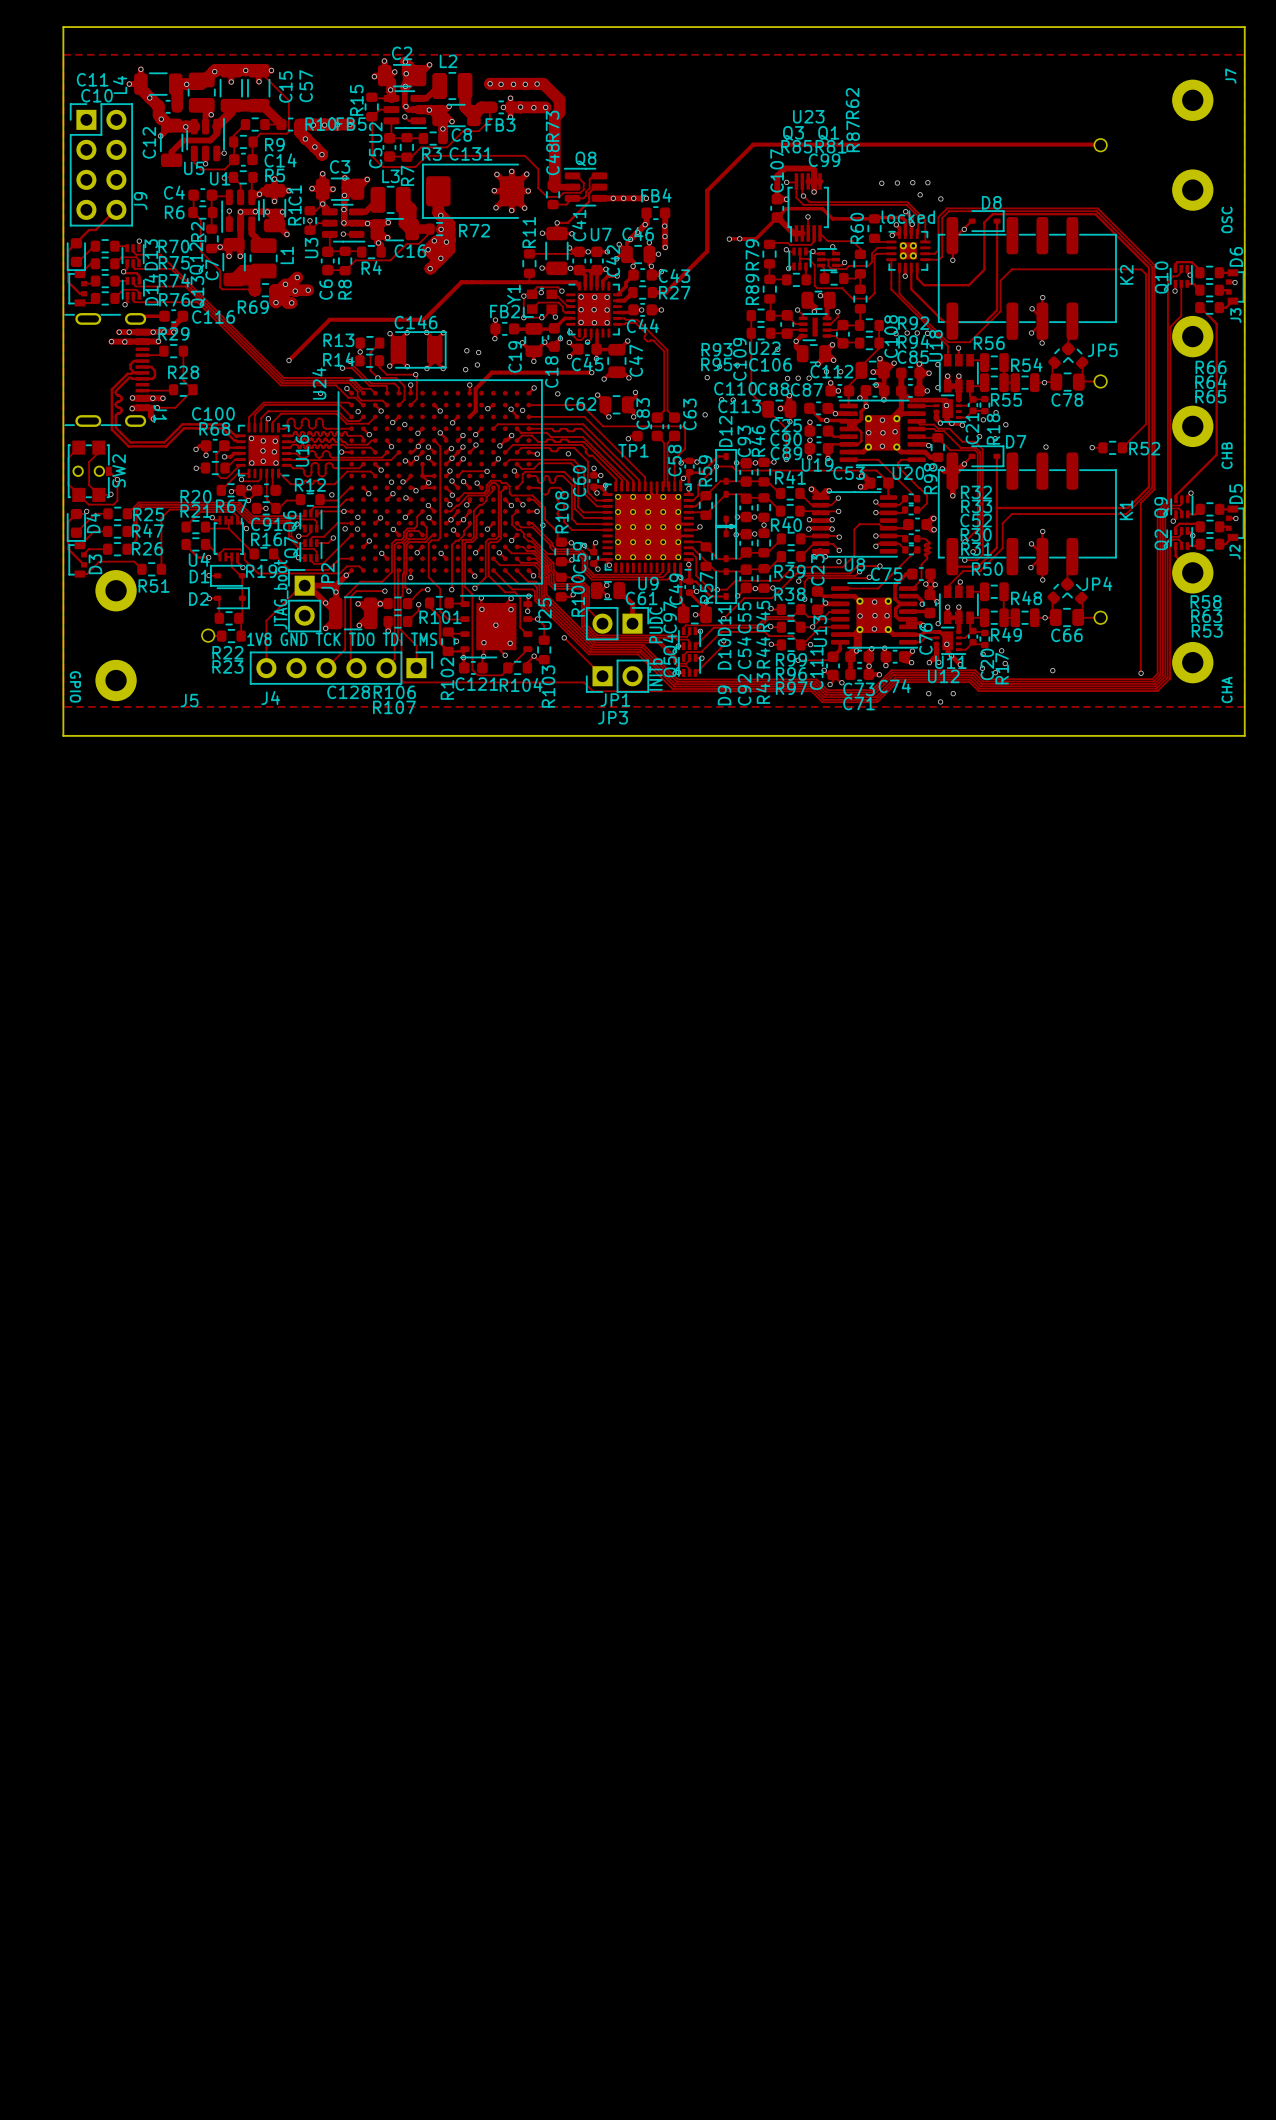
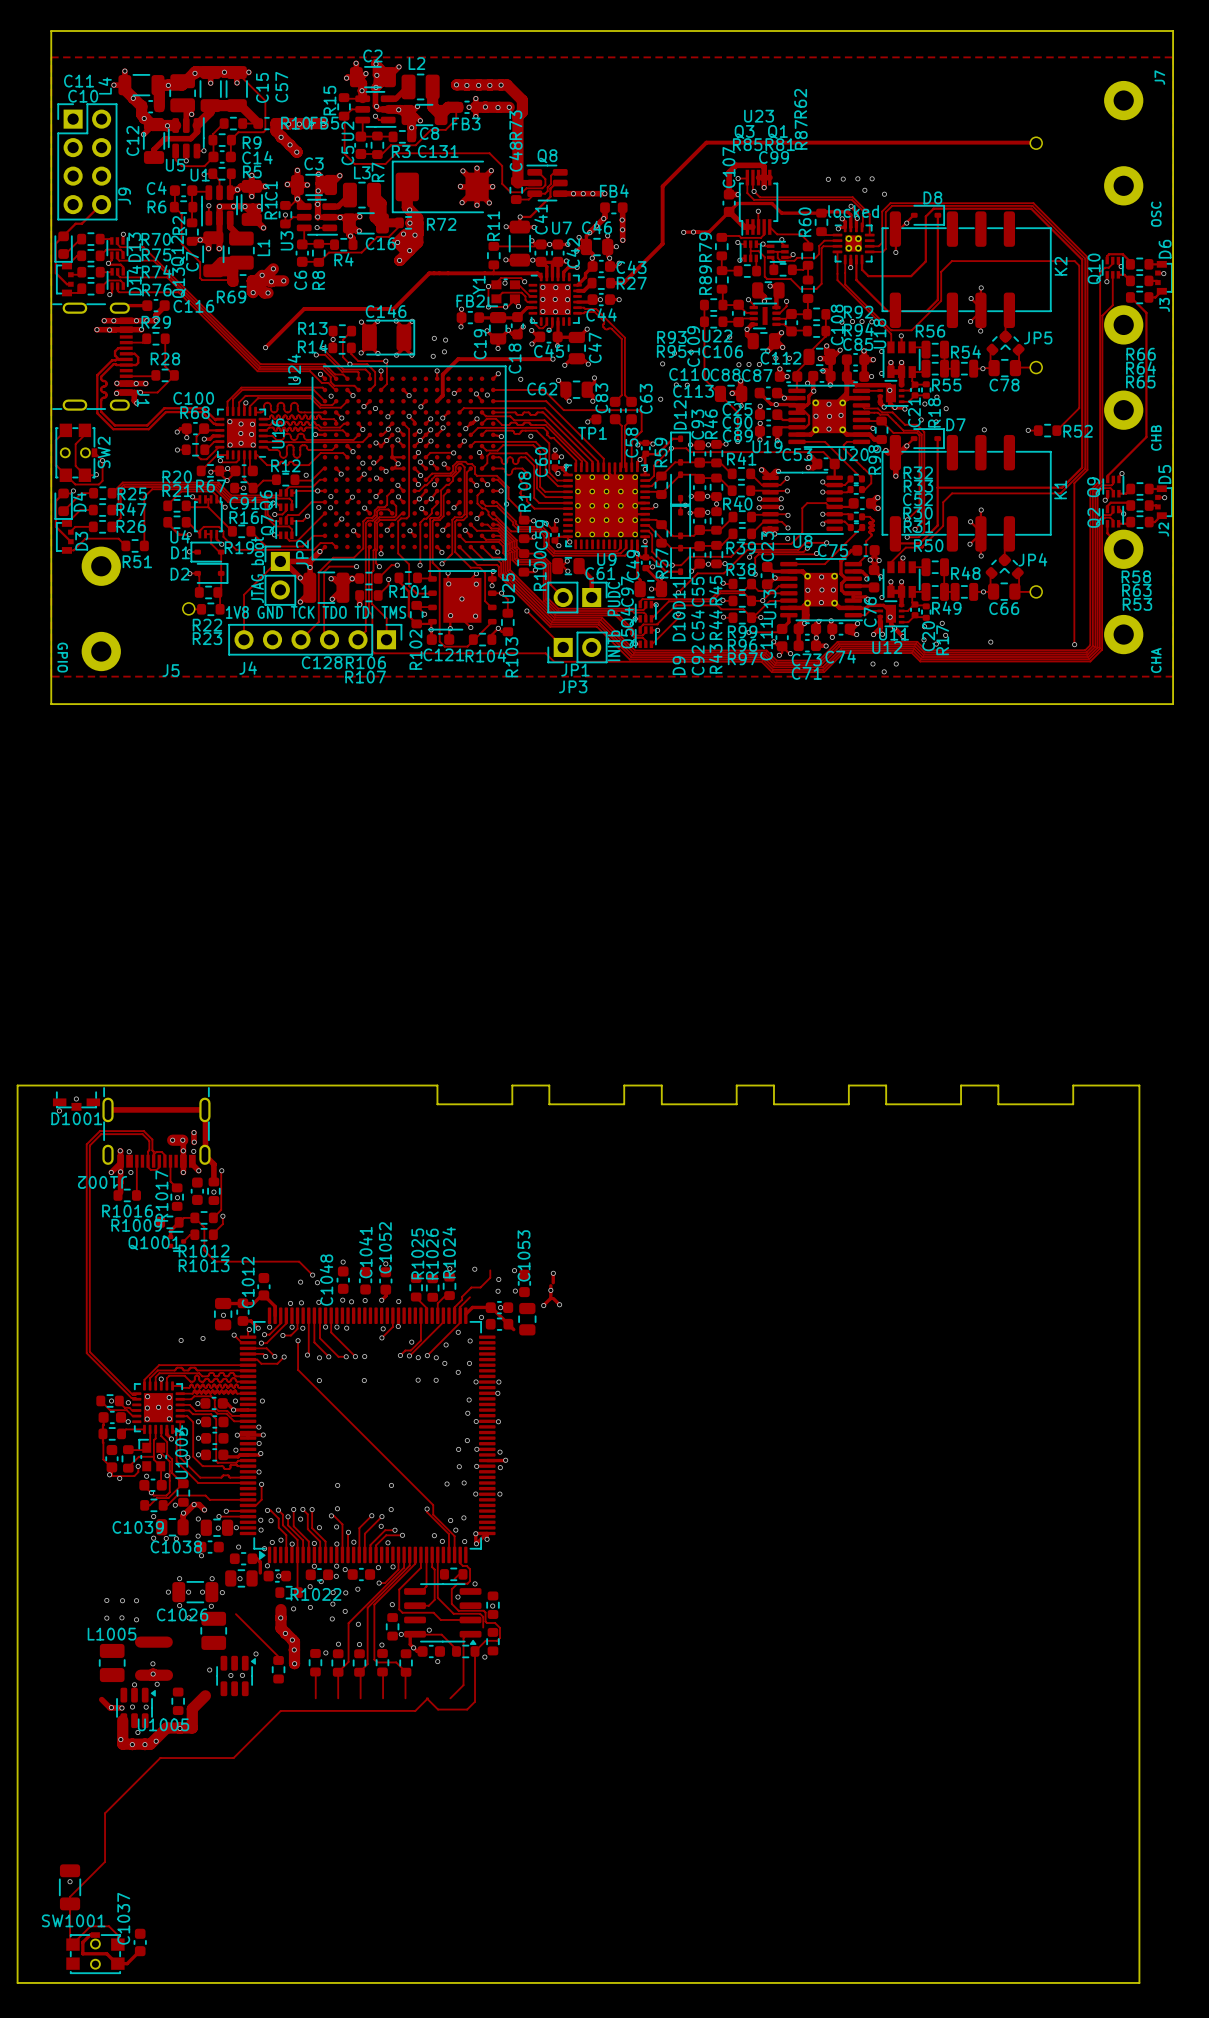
board edge: none -> (17, 1085) (437, 1085) (437, 1104) (512, 1104) (512, 1085) (549, 1085) (549, 1104) (624, 1104) (624, 1085) (661, 1085) (661, 1104) (736, 1104) (736, 1085) (773, 1085) (773, 1104) (848, 1104) (848, 1085) (886, 1085) (886, 1104) (961, 1104) (961, 1085) (998, 1085) (998, 1104) (1073, 1104) (1073, 1085) (1139, 1085) (1139, 1982) (17, 1982) (17, 1085)
via: none -> (76, 1098)
D1001: none -> (76, 1101)
track: none -> (205, 1108) (205, 1155) (213, 1164) (213, 1181)
track: none -> (108, 1109) (204, 1109)
via: none -> (59, 1110)
J1002: none -> (156, 1127)
track: none -> (194, 1132) (194, 1142)
via: none -> (194, 1132)
track: none -> (172, 1140) (183, 1140) (183, 1172)
via: none -> (172, 1140)
via: none -> (182, 1140)
via: none -> (194, 1142)
track: none -> (120, 1150) (120, 1192)
via: none -> (120, 1150)
via: none -> (183, 1150)
via: none -> (193, 1151)
via: none -> (129, 1151)
track: none -> (165, 1155) (161, 1151) (156, 1151) (153, 1154) (153, 1161) (152, 1139) (143, 1131) (99, 1131) (86, 1144) (86, 1353) (131, 1398) (136, 1399)
track: none -> (136, 1161) (136, 1193)
track: none -> (159, 1161) (159, 1167) (156, 1169) (150, 1169) (148, 1167) (149, 1140) (142, 1134) (101, 1134) (89, 1145) (89, 1351) (132, 1394) (136, 1393)
track: none -> (170, 1161) (170, 1181) (177, 1188)
track: none -> (120, 1163) (111, 1172)
track: none -> (192, 1164) (198, 1170)
via: none -> (198, 1170)
track: none -> (221, 1170) (221, 1210) (213, 1217)
via: none -> (221, 1170)
via: none -> (120, 1171)
via: none -> (111, 1172)
via: none -> (130, 1172)
via: none -> (183, 1172)
part: none -> (197, 1191)
part: none -> (213, 1191)
via: none -> (213, 1192)
R1016: none -> (127, 1195)
R1017: none -> (177, 1197)
via: none -> (177, 1197)
track: none -> (222, 1216) (222, 1224) (212, 1234)
via: none -> (222, 1216)
R1012: none -> (204, 1217)
R1009: none -> (169, 1222)
track: none -> (179, 1222) (170, 1230) (170, 1236)
track: none -> (178, 1223) (184, 1217) (194, 1217) (204, 1227) (204, 1250) (215, 1261) (299, 1261) (312, 1275)
R1013: none -> (204, 1234)
track: none -> (194, 1235) (189, 1235) (183, 1241)
Q1001: none -> (174, 1241)
via: none -> (343, 1262)
via: none -> (385, 1263)
via: none -> (449, 1268)
via: none -> (474, 1269)
track: none -> (490, 1270) (490, 1277) (480, 1287) (471, 1287) (462, 1296) (462, 1299) (454, 1307) (454, 1315)
via: none -> (514, 1270)
track: none -> (553, 1273) (553, 1282)
via: none -> (553, 1273)
via: none -> (312, 1275)
via: none -> (498, 1279)
C1048: none -> (343, 1280)
C1041: none -> (365, 1280)
C1052: none -> (385, 1280)
via: none -> (300, 1282)
via: none -> (317, 1282)
C1053: none -> (524, 1283)
track: none -> (550, 1285) (550, 1298)
C1012: none -> (263, 1286)
R1024: none -> (449, 1286)
R1026: none -> (416, 1287)
R1025: none -> (432, 1288)
track: none -> (386, 1289) (386, 1295) (381, 1300)
via: none -> (550, 1290)
via: none -> (498, 1291)
via: none -> (515, 1291)
track: none -> (263, 1293) (253, 1303) (223, 1303)
track: none -> (263, 1295) (275, 1306) (275, 1315)
track: none -> (445, 1295) (437, 1303) (437, 1315)
track: none -> (415, 1297) (426, 1307) (426, 1315)
track: none -> (470, 1297) (460, 1307) (460, 1315)
track: none -> (550, 1298) (543, 1305)
track: none -> (553, 1298) (559, 1304)
via: none -> (342, 1300)
via: none -> (381, 1300)
via: none -> (365, 1300)
via: none -> (318, 1302)
via: none -> (351, 1301)
via: none -> (398, 1301)
via: none -> (301, 1302)
via: none -> (290, 1303)
via: none -> (559, 1304)
via: none -> (543, 1305)
track: none -> (491, 1307) (472, 1307) (465, 1314)
part: none -> (499, 1307)
via: none -> (500, 1307)
track: none -> (492, 1308) (513, 1329)
part: none -> (242, 1312)
part: none -> (223, 1314)
via: none -> (223, 1315)
track: none -> (280, 1315) (280, 1323) (269, 1334) (264, 1334)
track: none -> (286, 1315) (286, 1323) (266, 1343) (261, 1343)
track: none -> (297, 1315) (297, 1328) (290, 1335) (282, 1335)
track: none -> (308, 1315) (307, 1355)
track: none -> (314, 1315) (314, 1342) (328, 1356)
track: none -> (319, 1315) (319, 1338) (338, 1356) (346, 1356)
track: none -> (331, 1315) (331, 1332) (355, 1356)
track: none -> (392, 1315) (392, 1326) (381, 1337)
track: none -> (420, 1315) (420, 1340) (410, 1350) (405, 1350) (400, 1355)
via: none -> (481, 1317)
part: none -> (527, 1319)
track: none -> (242, 1320) (251, 1320) (258, 1328)
track: none -> (443, 1322) (409, 1355)
track: none -> (459, 1323) (427, 1355)
part: none -> (499, 1324)
via: none -> (325, 1327)
via: none -> (398, 1326)
via: none -> (269, 1327)
via: none -> (292, 1327)
via: none -> (336, 1327)
via: none -> (258, 1328)
via: none -> (302, 1328)
via: none -> (346, 1328)
via: none -> (383, 1328)
track: none -> (249, 1329) (248, 1337)
via: none -> (249, 1329)
via: none -> (458, 1332)
via: none -> (264, 1334)
track: none -> (234, 1335) (241, 1342)
via: none -> (234, 1335)
via: none -> (282, 1335)
via: none -> (203, 1338)
via: none -> (381, 1337)
via: none -> (181, 1340)
track: none -> (298, 1340) (298, 1369) (433, 1505) (433, 1514) (454, 1536) (454, 1554)
via: none -> (298, 1340)
via: none -> (470, 1340)
via: none -> (411, 1342)
via: none -> (261, 1343)
via: none -> (446, 1344)
track: none -> (248, 1348) (266, 1348) (274, 1356)
track: none -> (247, 1353) (263, 1353) (265, 1356)
via: none -> (307, 1355)
via: none -> (400, 1355)
via: none -> (265, 1356)
via: none -> (274, 1356)
via: none -> (364, 1356)
via: none -> (409, 1355)
via: none -> (427, 1355)
track: none -> (284, 1356) (277, 1363) (261, 1363) (257, 1359) (248, 1359)
via: none -> (284, 1356)
via: none -> (328, 1356)
via: none -> (346, 1356)
via: none -> (355, 1356)
via: none -> (319, 1357)
via: none -> (418, 1357)
via: none -> (436, 1357)
via: none -> (444, 1363)
via: none -> (469, 1363)
track: none -> (247, 1365) (159, 1365) (144, 1379) (144, 1385)
track: none -> (248, 1370) (197, 1370) (194, 1367) (190, 1367) (188, 1370) (177, 1367) (174, 1370) (157, 1370) (150, 1378) (150, 1385)
via: none -> (458, 1372)
track: none -> (247, 1376) (235, 1376) (232, 1373) (227, 1376) (222, 1373) (217, 1376) (212, 1373) (207, 1376) (202, 1376) (199, 1373) (159, 1373) (155, 1377) (155, 1385)
via: none -> (161, 1379)
via: none -> (418, 1380)
via: none -> (436, 1380)
via: none -> (319, 1380)
via: none -> (364, 1380)
track: none -> (248, 1381) (236, 1381) (234, 1378) (229, 1381) (225, 1378) (221, 1381) (216, 1378) (212, 1381) (207, 1378) (201, 1381) (197, 1375) (194, 1381) (190, 1381) (184, 1375) (169, 1375) (166, 1378) (166, 1385)
via: none -> (476, 1381)
via: none -> (498, 1382)
track: none -> (172, 1385) (189, 1387) (191, 1384) (194, 1387) (197, 1384) (200, 1387) (202, 1384) (205, 1387) (208, 1384) (211, 1387) (214, 1384) (216, 1387) (219, 1384) (222, 1387) (225, 1384) (228, 1387) (230, 1384) (233, 1387) (236, 1384) (239, 1387) (248, 1387)
via: none -> (497, 1393)
track: none -> (180, 1393) (192, 1393) (194, 1390) (196, 1393) (199, 1390) (201, 1393) (203, 1390) (205, 1393) (208, 1390) (209, 1393) (212, 1390) (215, 1393) (217, 1390) (219, 1393) (221, 1390) (223, 1393) (226, 1390) (228, 1393) (230, 1390) (233, 1393) (235, 1390) (237, 1393) (247, 1393)
via: none -> (147, 1396)
via: none -> (169, 1397)
track: none -> (180, 1399) (191, 1399) (194, 1396) (211, 1396) (214, 1399) (214, 1407) (218, 1410) (227, 1410) (232, 1415) (248, 1415)
via: none -> (469, 1399)
track: none -> (100, 1400) (110, 1410) (126, 1410) (132, 1416) (136, 1416)
part: none -> (110, 1400)
via: none -> (111, 1401)
via: none -> (235, 1401)
via: none -> (262, 1401)
track: none -> (118, 1401) (124, 1407) (136, 1410)
via: none -> (128, 1402)
via: none -> (197, 1403)
part: none -> (214, 1403)
track: none -> (222, 1403) (227, 1403) (233, 1409) (247, 1409)
track: none -> (180, 1404) (189, 1404) (195, 1410) (214, 1410) (217, 1413) (226, 1413) (234, 1421) (248, 1421)
via: none -> (158, 1407)
via: none -> (169, 1407)
via: none -> (147, 1408)
U1003: none -> (158, 1408)
track: none -> (180, 1410) (189, 1410) (192, 1414) (211, 1414) (216, 1419) (216, 1461) (217, 1462) (248, 1460)
via: none -> (233, 1409)
via: none -> (467, 1413)
track: none -> (180, 1416) (187, 1416) (193, 1422) (193, 1456) (202, 1466) (222, 1466) (225, 1469) (229, 1468) (230, 1465) (248, 1466)
track: none -> (103, 1417) (103, 1459) (111, 1467)
part: none -> (112, 1417)
via: none -> (147, 1419)
via: none -> (169, 1418)
via: none -> (128, 1421)
track: none -> (180, 1421) (180, 1457) (200, 1477) (221, 1477) (223, 1475) (228, 1475) (230, 1477) (247, 1477)
via: none -> (198, 1421)
part: none -> (214, 1421)
via: none -> (476, 1421)
via: none -> (498, 1421)
via: none -> (258, 1427)
track: none -> (161, 1428) (161, 1436) (167, 1442) (167, 1454) (172, 1459) (172, 1473) (182, 1483)
track: none -> (144, 1429) (125, 1429) (121, 1433)
track: none -> (150, 1429) (150, 1444)
track: none -> (155, 1429) (153, 1459) (161, 1466) (161, 1485)
track: none -> (166, 1429) (166, 1434) (171, 1439)
track: none -> (172, 1429) (176, 1433) (176, 1461) (198, 1483) (248, 1483)
part: none -> (112, 1433)
via: none -> (237, 1435)
track: none -> (263, 1435) (237, 1435)
via: none -> (263, 1435)
part: none -> (367, 1435)
via: none -> (171, 1439)
via: none -> (198, 1438)
part: none -> (214, 1438)
via: none -> (467, 1440)
via: none -> (259, 1443)
via: none -> (458, 1449)
via: none -> (476, 1449)
track: none -> (128, 1450) (144, 1450)
via: none -> (235, 1450)
via: none -> (500, 1452)
track: none -> (160, 1452) (169, 1461) (169, 1492) (166, 1495) (153, 1495) (144, 1486)
track: none -> (260, 1453) (239, 1454) (238, 1456) (226, 1456) (224, 1454)
via: none -> (260, 1453)
part: none -> (152, 1455)
via: none -> (198, 1454)
part: none -> (214, 1454)
track: none -> (153, 1456) (138, 1456) (128, 1467)
via: none -> (159, 1456)
via: none -> (187, 1457)
part: none -> (111, 1458)
part: none -> (128, 1458)
track: none -> (505, 1460) (487, 1460)
via: none -> (505, 1460)
track: none -> (138, 1466) (138, 1472) (134, 1476) (112, 1476) (111, 1467)
via: none -> (138, 1466)
via: none -> (476, 1466)
via: none -> (459, 1466)
via: none -> (500, 1467)
via: none -> (259, 1472)
via: none -> (109, 1474)
via: none -> (167, 1475)
via: none -> (146, 1476)
via: none -> (119, 1478)
track: none -> (183, 1483) (168, 1498) (157, 1498) (149, 1505) (144, 1505)
via: none -> (464, 1482)
track: none -> (261, 1484) (261, 1499) (256, 1505) (247, 1505)
via: none -> (261, 1484)
via: none -> (447, 1484)
part: none -> (153, 1485)
via: none -> (337, 1485)
via: none -> (391, 1485)
via: none -> (151, 1492)
part: none -> (183, 1493)
via: none -> (475, 1494)
via: none -> (499, 1494)
track: none -> (248, 1499) (209, 1499) (205, 1495) (177, 1495) (167, 1505) (163, 1505)
via: none -> (194, 1504)
part: none -> (153, 1505)
via: none -> (175, 1505)
track: none -> (302, 1509) (307, 1514) (307, 1529) (320, 1541) (320, 1555)
via: none -> (302, 1509)
via: none -> (337, 1508)
track: none -> (427, 1509) (427, 1512) (448, 1534) (448, 1554)
via: none -> (427, 1509)
track: none -> (204, 1509) (199, 1504) (194, 1504) (183, 1515) (183, 1527)
via: none -> (204, 1509)
track: none -> (278, 1510) (282, 1514) (282, 1525) (297, 1539) (297, 1592)
via: none -> (278, 1510)
track: none -> (293, 1509) (293, 1526) (308, 1541) (308, 1555)
via: none -> (293, 1509)
track: none -> (312, 1509) (312, 1528) (325, 1541) (325, 1555)
via: none -> (312, 1509)
via: none -> (391, 1509)
via: none -> (226, 1511)
track: none -> (248, 1511) (226, 1511)
track: none -> (267, 1510) (270, 1510) (278, 1518) (278, 1527) (286, 1535) (286, 1554)
via: none -> (267, 1510)
via: none -> (183, 1513)
track: none -> (331, 1515) (333, 1515) (342, 1524) (342, 1555)
via: none -> (331, 1515)
track: none -> (371, 1515) (359, 1528) (359, 1555)
via: none -> (371, 1515)
via: none -> (153, 1516)
track: none -> (218, 1516) (247, 1516)
via: none -> (218, 1516)
track: none -> (288, 1516) (288, 1525) (303, 1540) (303, 1554)
via: none -> (288, 1516)
track: none -> (381, 1516) (364, 1533) (364, 1554)
via: none -> (381, 1516)
via: none -> (463, 1517)
via: none -> (198, 1518)
via: none -> (300, 1519)
via: none -> (260, 1520)
via: none -> (271, 1520)
via: none -> (450, 1520)
via: none -> (381, 1526)
C1039: none -> (172, 1527)
via: none -> (336, 1526)
part: none -> (216, 1527)
via: none -> (218, 1528)
via: none -> (236, 1527)
via: none -> (319, 1527)
via: none -> (261, 1530)
track: none -> (395, 1530) (385, 1530) (370, 1545) (370, 1555)
via: none -> (395, 1530)
via: none -> (455, 1530)
track: none -> (348, 1532) (348, 1554)
via: none -> (348, 1532)
via: none -> (475, 1533)
track: none -> (486, 1533) (476, 1543) (475, 1543) (476, 1533) (487, 1533) (487, 1539)
track: none -> (402, 1535) (386, 1535) (376, 1545) (376, 1554)
via: none -> (402, 1535)
via: none -> (434, 1535)
via: none -> (198, 1536)
via: none -> (153, 1538)
via: none -> (166, 1538)
via: none -> (176, 1538)
via: none -> (487, 1539)
via: none -> (280, 1540)
via: none -> (442, 1541)
via: none -> (464, 1541)
via: none -> (272, 1542)
via: none -> (353, 1542)
via: none -> (314, 1543)
via: none -> (387, 1542)
via: none -> (292, 1544)
via: none -> (336, 1544)
via: none -> (476, 1543)
C1038: none -> (210, 1547)
via: none -> (238, 1547)
via: none -> (264, 1548)
track: none -> (432, 1553) (432, 1567) (434, 1569) (434, 1599) (428, 1605) (415, 1605)
track: none -> (398, 1554) (398, 1569) (385, 1583) (379, 1583)
track: none -> (404, 1554) (404, 1567) (348, 1623) (348, 1661) (338, 1672) (338, 1698)
track: none -> (409, 1554) (409, 1565) (367, 1607) (367, 1664) (359, 1672)
track: none -> (415, 1554) (415, 1563) (374, 1604) (374, 1659) (377, 1662) (396, 1662) (406, 1672)
track: none -> (420, 1554) (420, 1567) (399, 1589) (399, 1609) (402, 1612) (433, 1612) (440, 1619) (470, 1619)
track: none -> (426, 1554) (426, 1586) (421, 1591)
track: none -> (437, 1554) (437, 1597) (453, 1613) (480, 1613) (483, 1616) (483, 1627)
track: none -> (460, 1554) (460, 1563) (470, 1569) (470, 1581) (467, 1583) (457, 1583) (451, 1589) (451, 1603) (458, 1610) (483, 1610) (485, 1621) (495, 1623) (499, 1627) (499, 1638) (497, 1640) (485, 1640) (475, 1651) (475, 1701) (467, 1709) (438, 1709) (426, 1698)
via: none -> (201, 1555)
track: none -> (256, 1557) (260, 1562) (260, 1572)
part: none -> (243, 1558)
via: none -> (267, 1565)
via: none -> (314, 1566)
via: none -> (336, 1566)
via: none -> (393, 1566)
via: none -> (378, 1567)
via: none -> (345, 1569)
part: none -> (319, 1574)
part: none -> (361, 1574)
part: none -> (453, 1574)
track: none -> (459, 1574) (454, 1579)
part: none -> (277, 1576)
via: none -> (278, 1576)
via: none -> (336, 1576)
via: none -> (179, 1578)
via: none -> (212, 1578)
via: none -> (240, 1578)
part: none -> (241, 1578)
via: none -> (321, 1581)
via: none -> (379, 1583)
via: none -> (475, 1583)
via: none -> (310, 1586)
via: none -> (357, 1589)
via: none -> (168, 1592)
via: none -> (188, 1592)
C1026: none -> (195, 1592)
via: none -> (202, 1592)
via: none -> (222, 1592)
R1022: none -> (289, 1592)
via: none -> (333, 1592)
via: none -> (345, 1592)
via: none -> (457, 1597)
via: none -> (106, 1600)
via: none -> (122, 1600)
via: none -> (136, 1600)
via: none -> (332, 1604)
via: none -> (392, 1604)
part: none -> (493, 1605)
via: none -> (179, 1605)
via: none -> (211, 1606)
via: none -> (492, 1606)
via: none -> (310, 1607)
via: none -> (293, 1608)
track: none -> (280, 1609) (280, 1628) (294, 1641) (294, 1663)
via: none -> (345, 1611)
track: none -> (235, 1614) (278, 1656)
part: none -> (442, 1614)
via: none -> (106, 1618)
via: none -> (121, 1617)
via: none -> (188, 1617)
via: none -> (280, 1617)
via: none -> (332, 1618)
via: none -> (136, 1619)
via: none -> (358, 1624)
part: none -> (392, 1626)
part: none -> (213, 1630)
via: none -> (429, 1630)
via: none -> (285, 1633)
via: none -> (401, 1634)
track: none -> (414, 1634) (441, 1634) (456, 1649)
track: none -> (466, 1634) (463, 1638) (463, 1685) (450, 1698)
track: none -> (410, 1634) (410, 1644) (417, 1651) (422, 1651)
via: none -> (292, 1640)
track: none -> (140, 1642) (167, 1642)
part: none -> (492, 1641)
via: none -> (338, 1644)
via: none -> (359, 1644)
via: none -> (381, 1645)
via: none -> (413, 1647)
via: none -> (294, 1649)
part: none -> (431, 1651)
part: none -> (465, 1651)
via: none -> (325, 1652)
via: none -> (256, 1653)
via: none -> (484, 1657)
via: none -> (437, 1661)
L1005: none -> (112, 1662)
part: none -> (315, 1662)
part: none -> (338, 1662)
part: none -> (359, 1662)
part: none -> (382, 1662)
part: none -> (406, 1662)
via: none -> (152, 1663)
via: none -> (294, 1663)
part: none -> (278, 1669)
via: none -> (209, 1670)
track: none -> (315, 1671) (315, 1698)
track: none -> (383, 1671) (383, 1698)
track: none -> (405, 1671) (405, 1698)
track: none -> (360, 1673) (360, 1698)
via: none -> (153, 1674)
track: none -> (140, 1675) (167, 1675)
via: none -> (230, 1675)
via: none -> (242, 1675)
part: none -> (236, 1675)
via: none -> (134, 1684)
via: none -> (157, 1684)
track: none -> (205, 1695) (192, 1708) (192, 1728) (166, 1728) (150, 1744) (122, 1744) (122, 1720)
track: none -> (427, 1698) (415, 1710) (280, 1710) (233, 1758) (160, 1758) (105, 1813) (105, 1861) (70, 1896) (70, 1941)
track: none -> (101, 1699) (110, 1707) (121, 1707)
part: none -> (178, 1701)
via: none -> (111, 1707)
via: none -> (132, 1707)
U1005: none -> (136, 1707)
via: none -> (146, 1707)
via: none -> (121, 1708)
via: none -> (179, 1728)
via: none -> (137, 1732)
via: none -> (120, 1739)
via: none -> (156, 1741)
via: none -> (132, 1744)
via: none -> (144, 1744)
via: none -> (70, 1881)
part: none -> (70, 1887)
track: none -> (95, 1935) (90, 1935) (82, 1942) (82, 1953) (106, 1953) (117, 1964)
C1037: none -> (140, 1942)
track: none -> (117, 1944) (117, 1935) (109, 1926) (90, 1926) (72, 1944)
track: none -> (139, 1951) (127, 1963) (117, 1963)
SW1001: none -> (95, 1953)

